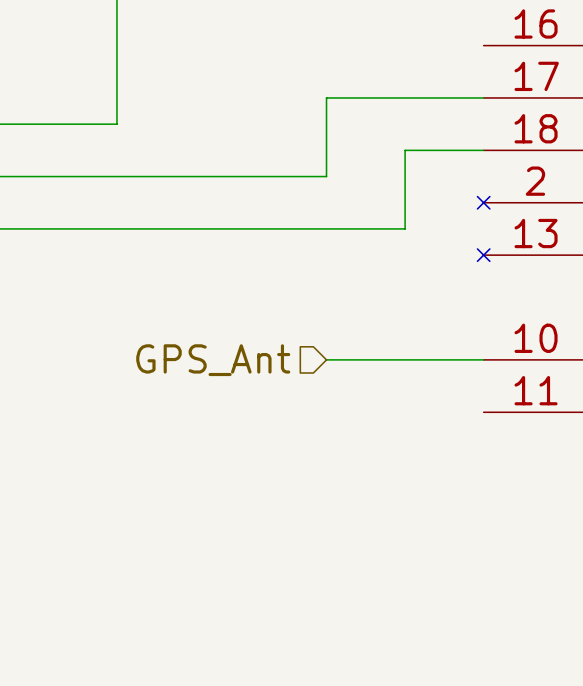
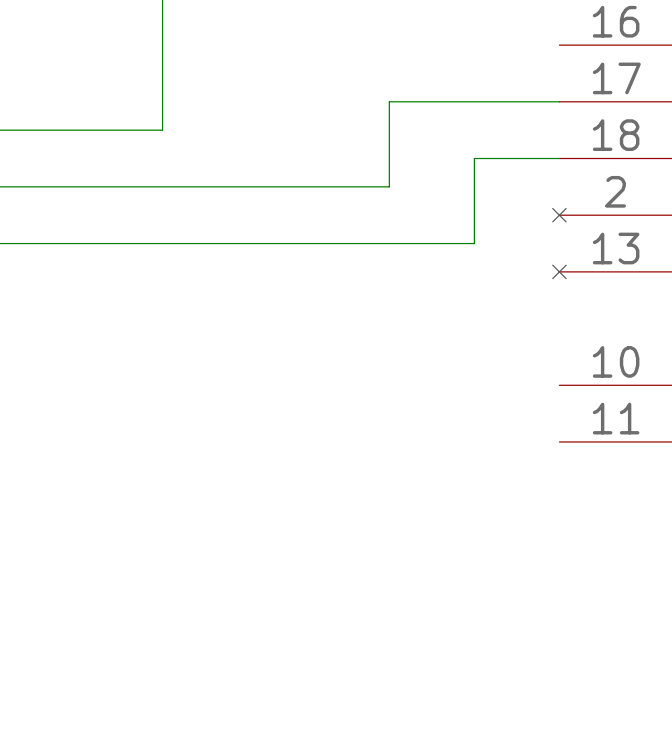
wire: (326, 359) (483, 359) -> none
hierarchical label: GPS_Ant (213, 360) -> none

